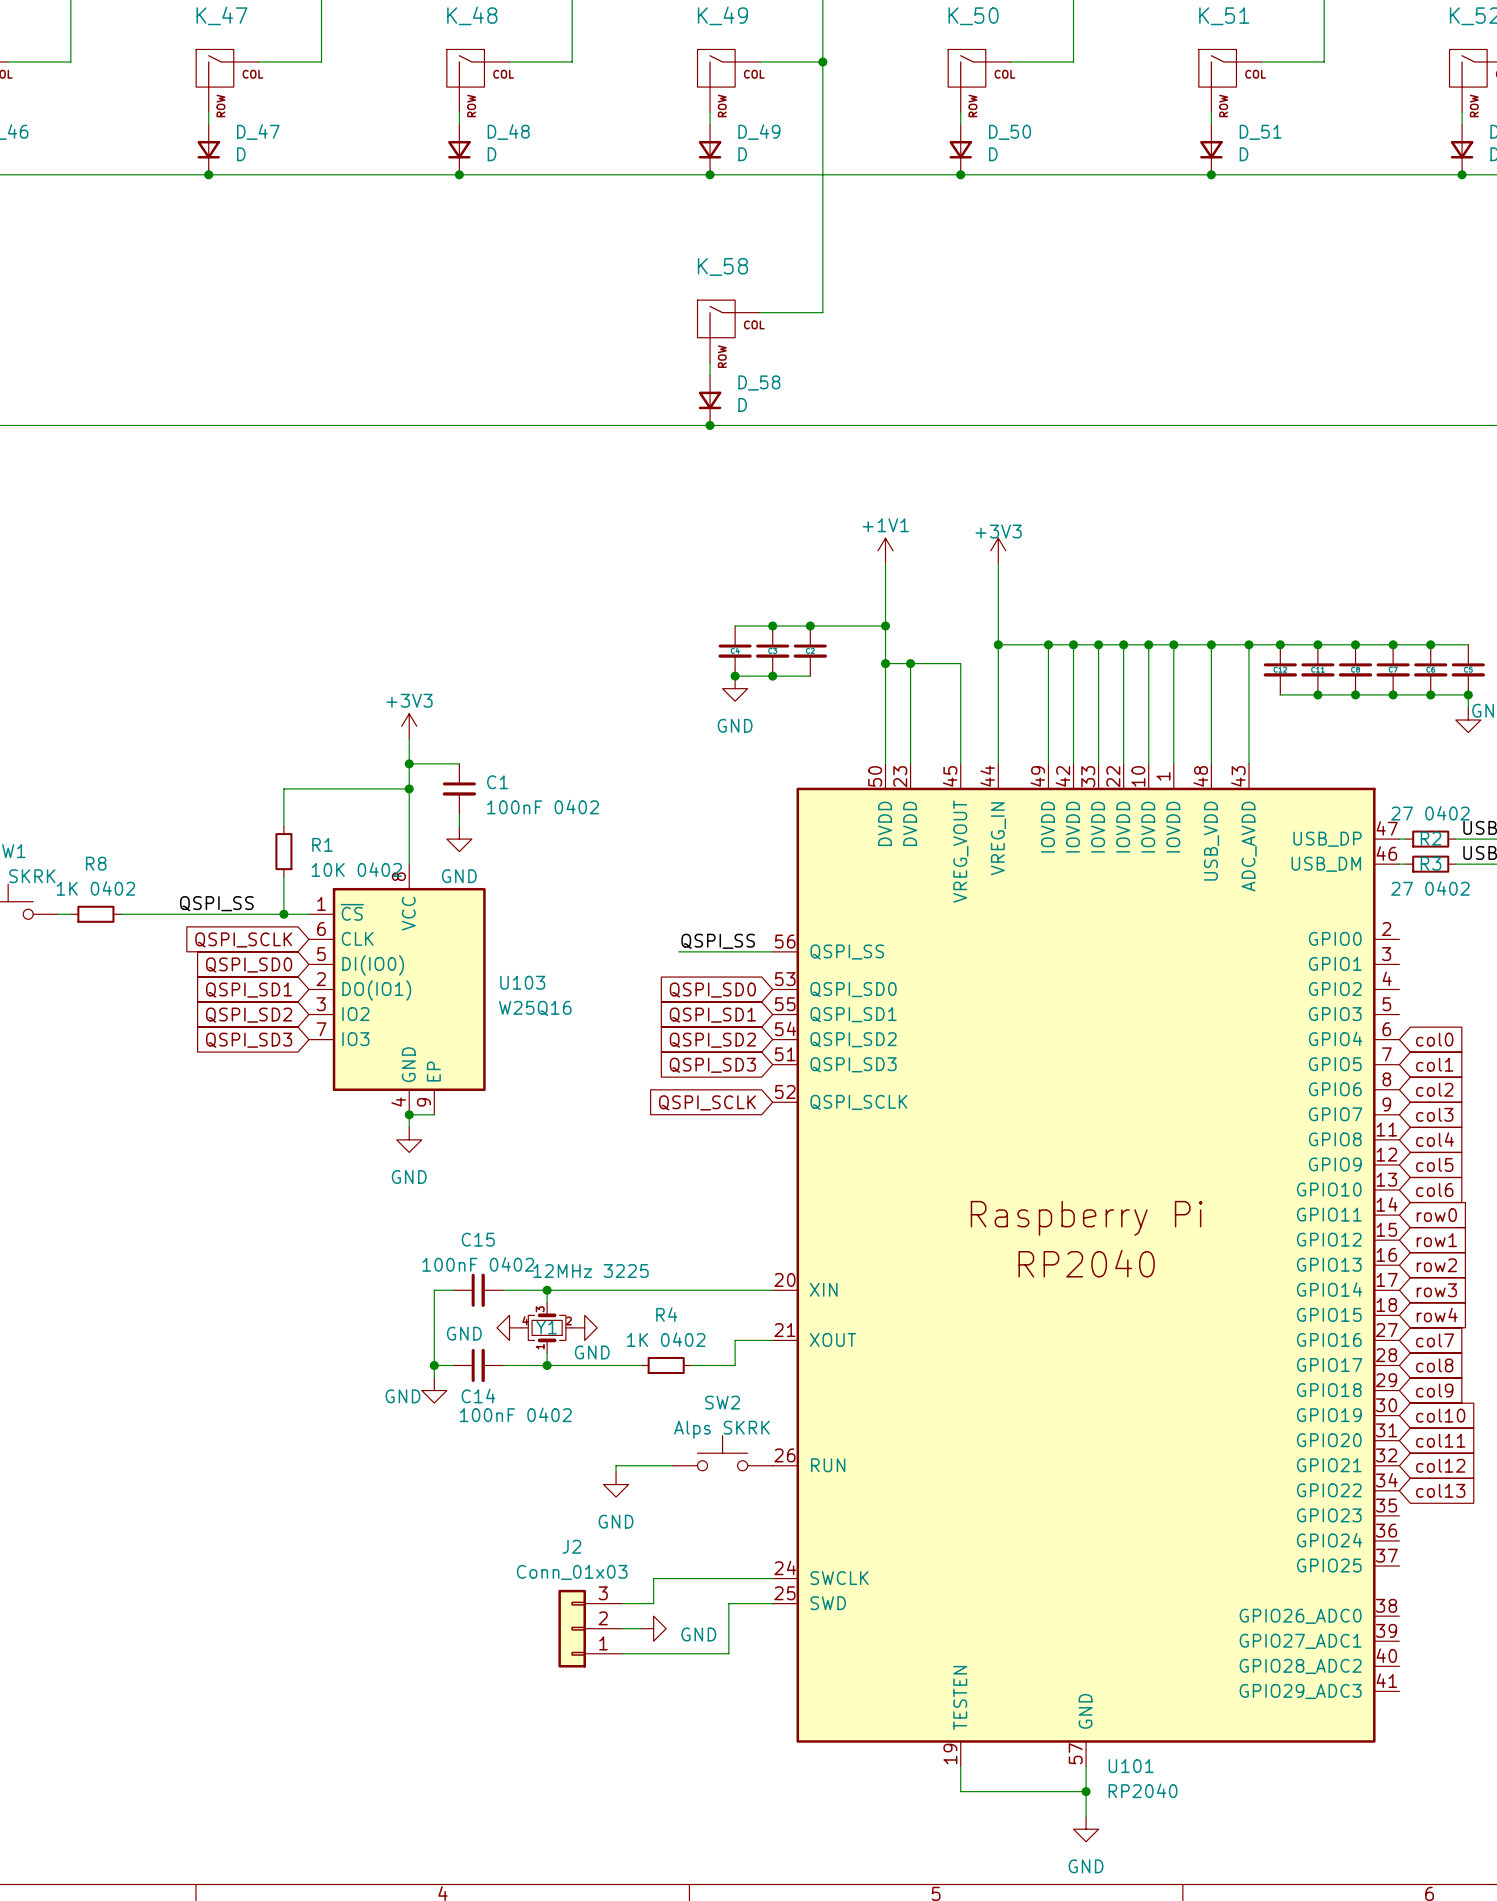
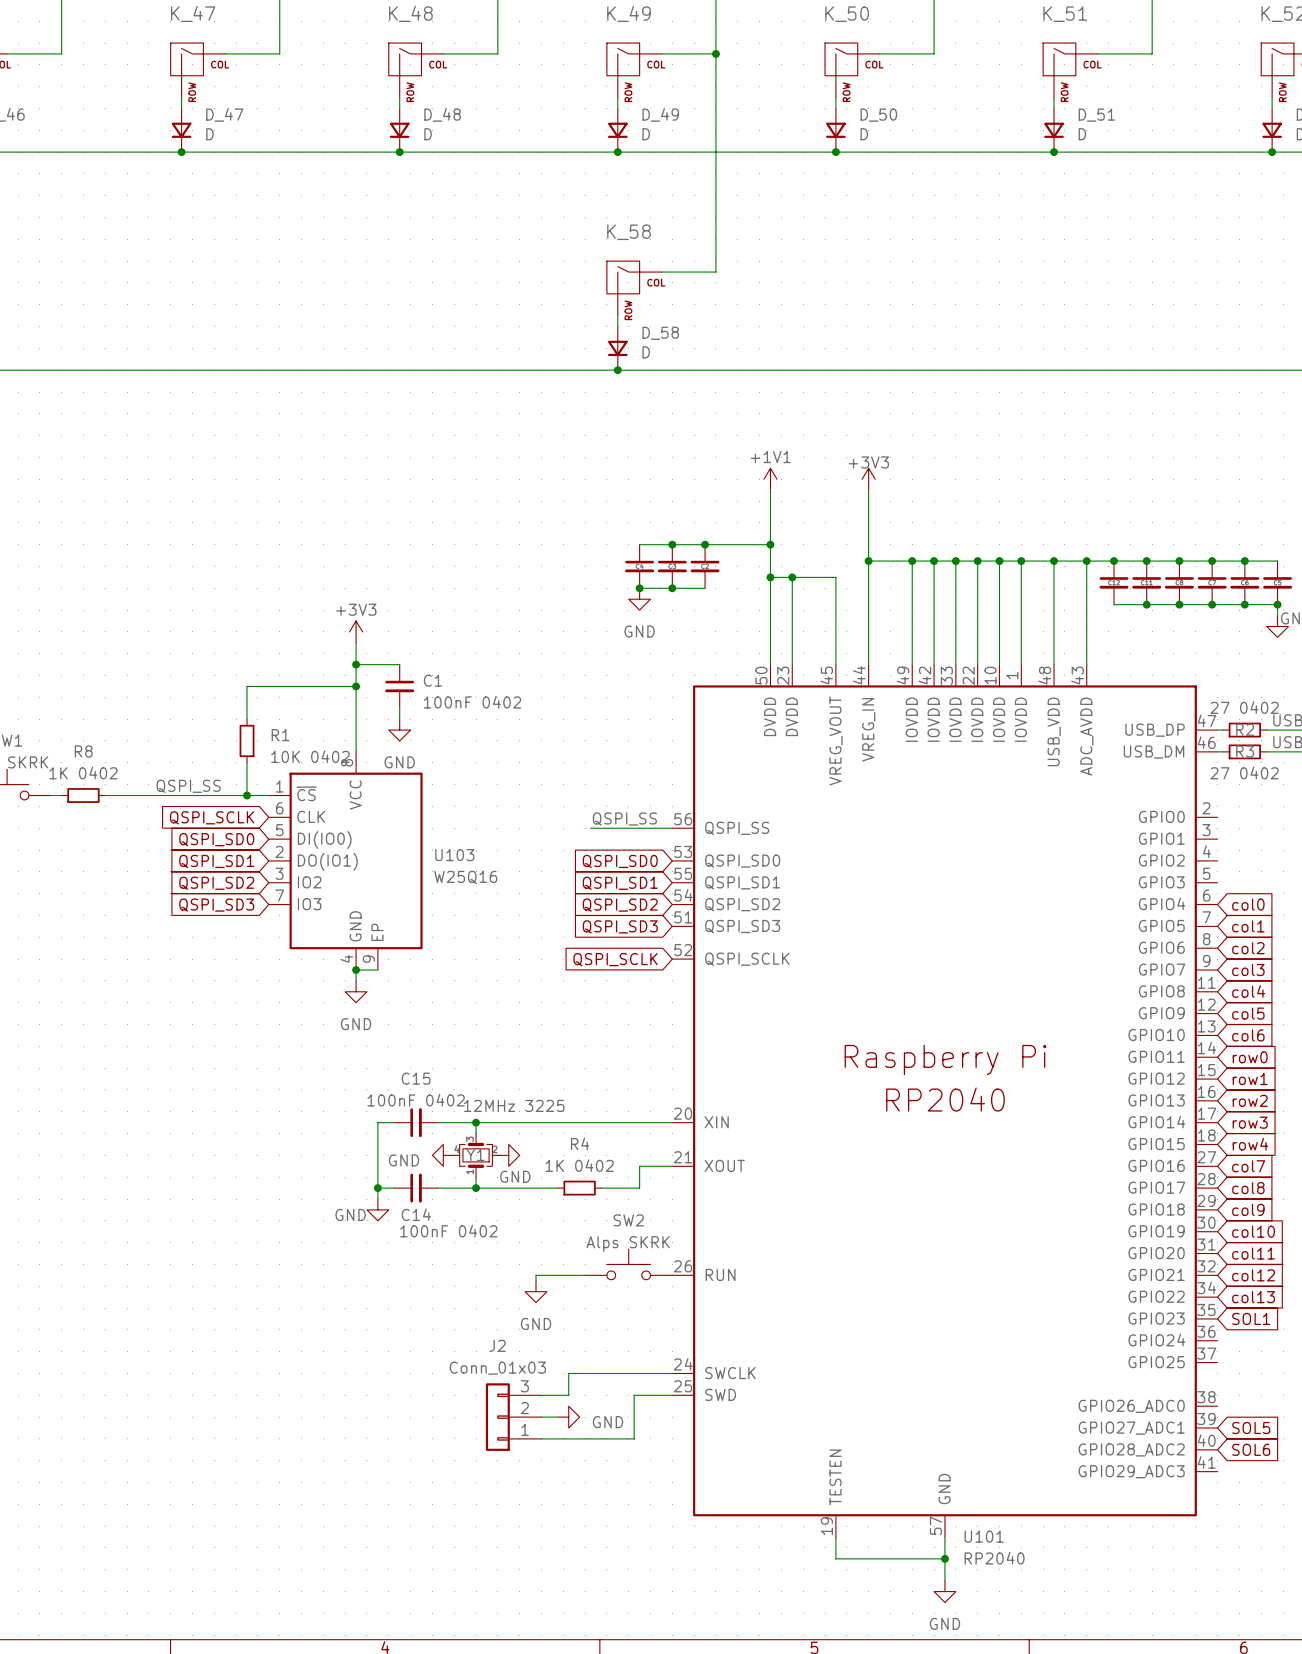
global label: none -> SOL1 (1251, 1318)
global label: none -> SOL5 (1251, 1428)
global label: none -> SOL6 (1251, 1449)

